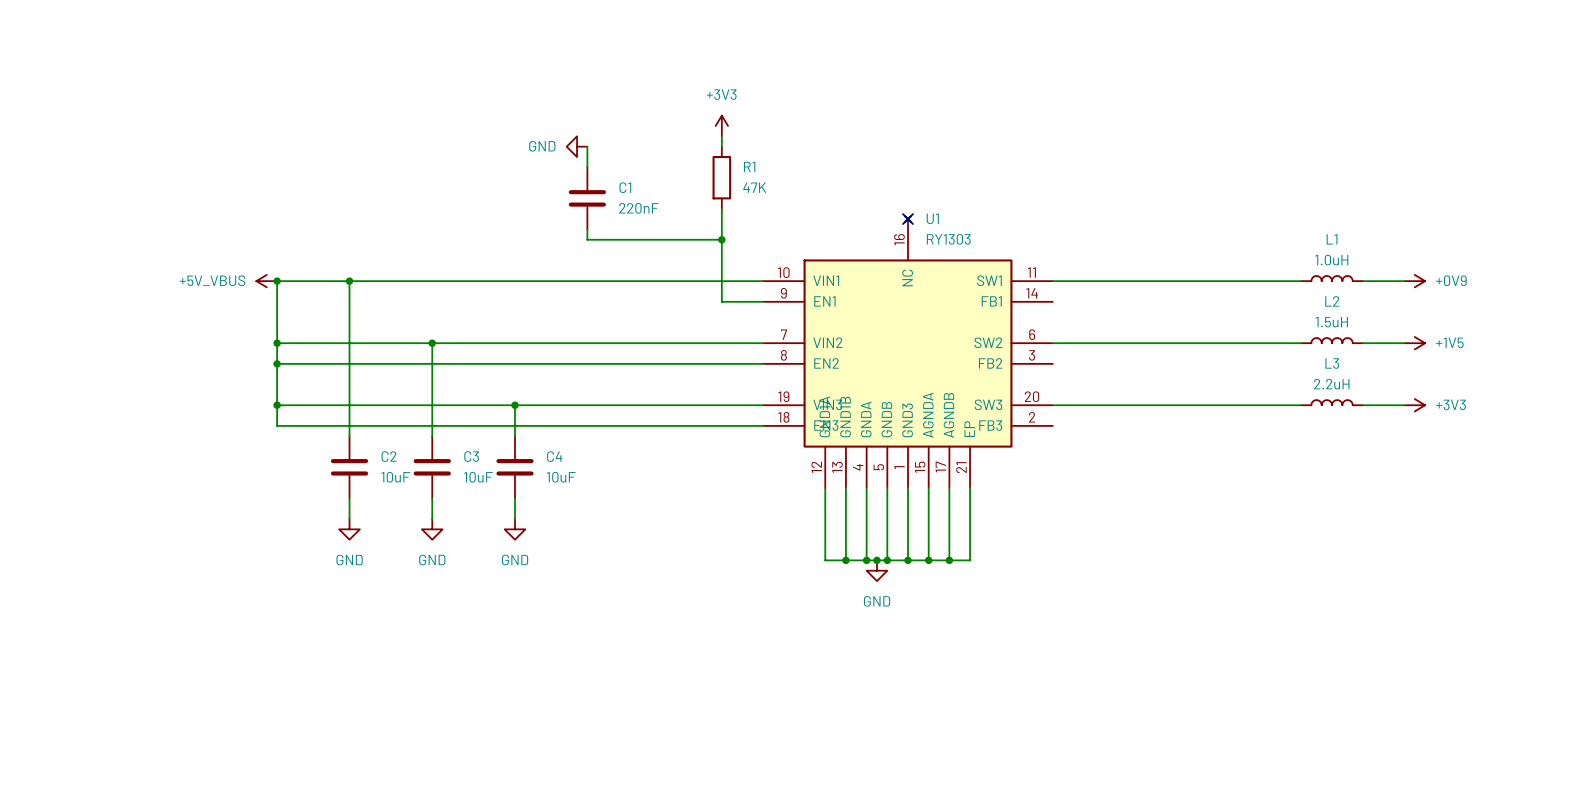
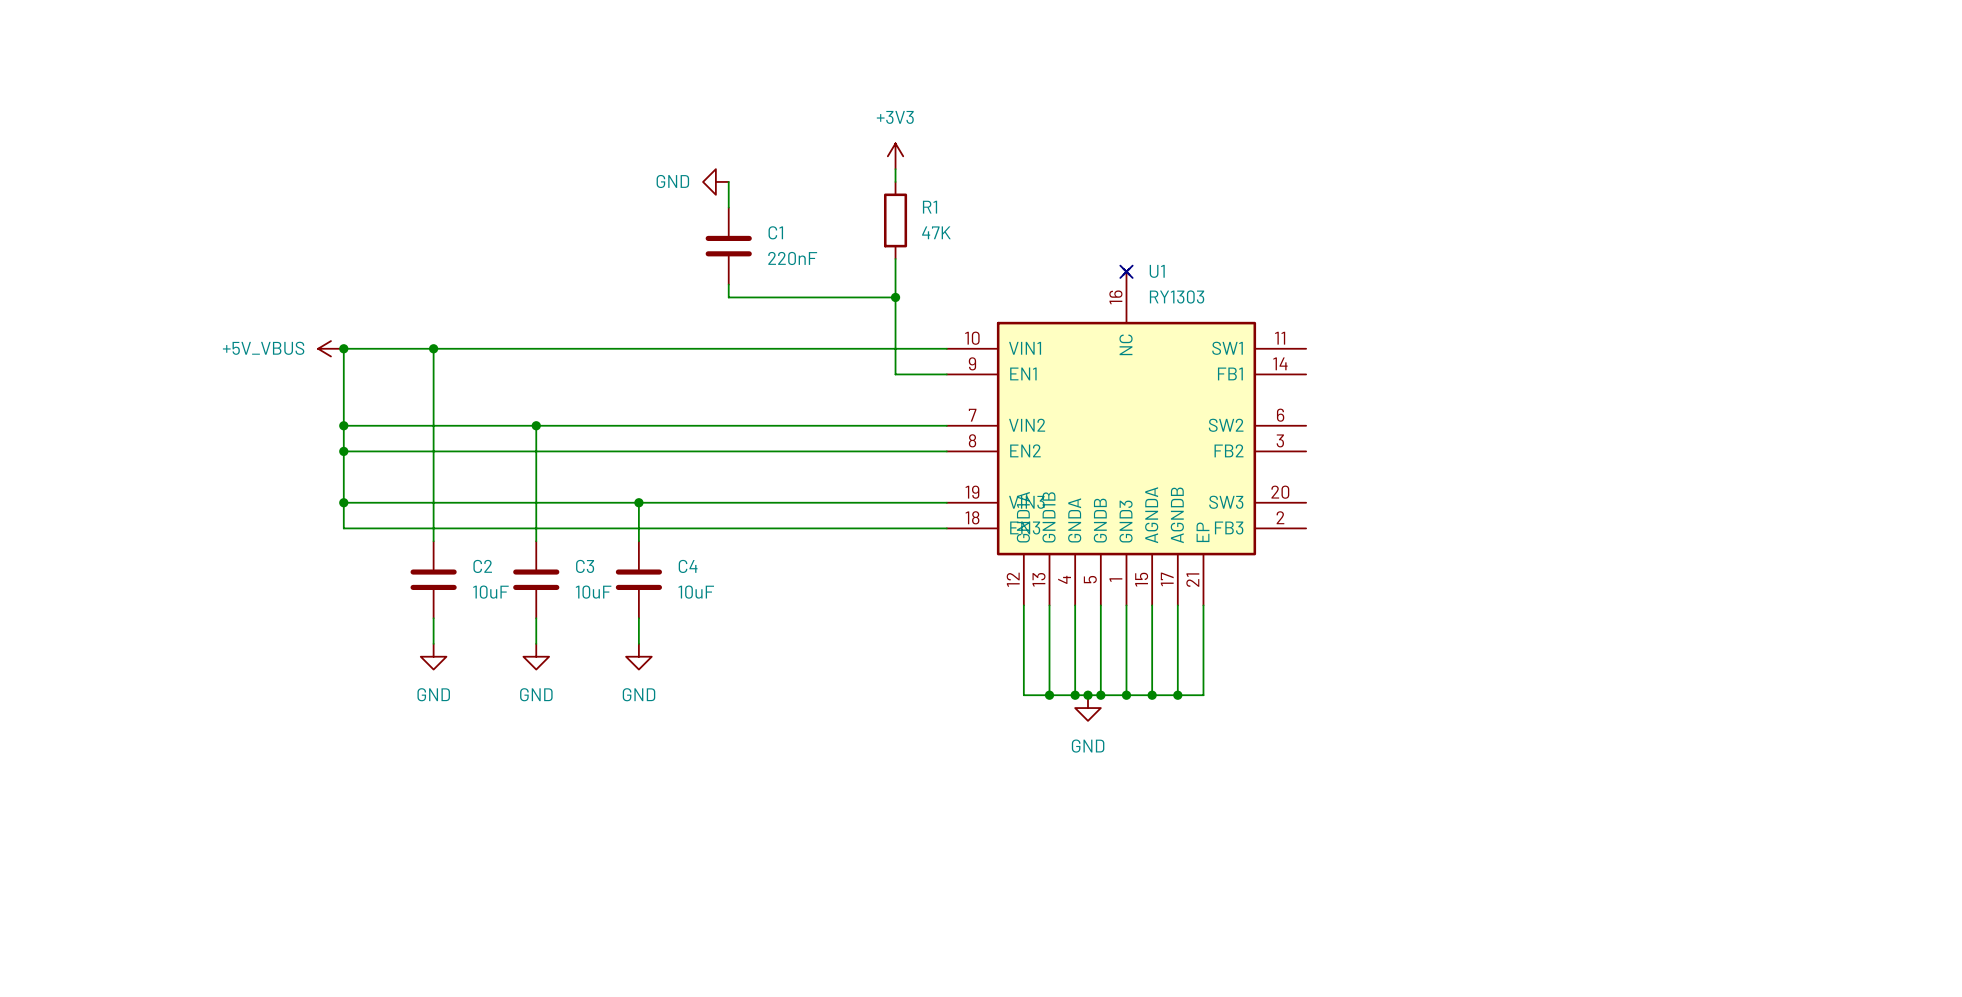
L1: 1.0uH (1332, 278) -> none
wire: (1052, 281) (1301, 281) -> none
wire: (1363, 281) (1404, 281) -> none
power symbol: +0V9 (1414, 281) -> none
L2: 1.5uH (1332, 340) -> none
wire: (1052, 343) (1301, 343) -> none
wire: (1363, 343) (1404, 343) -> none
power symbol: +1V5 (1414, 343) -> none
L3: 2.2uH (1332, 402) -> none
wire: (1052, 405) (1301, 405) -> none
wire: (1363, 405) (1404, 405) -> none
power symbol: +3V3 (1414, 405) -> none

